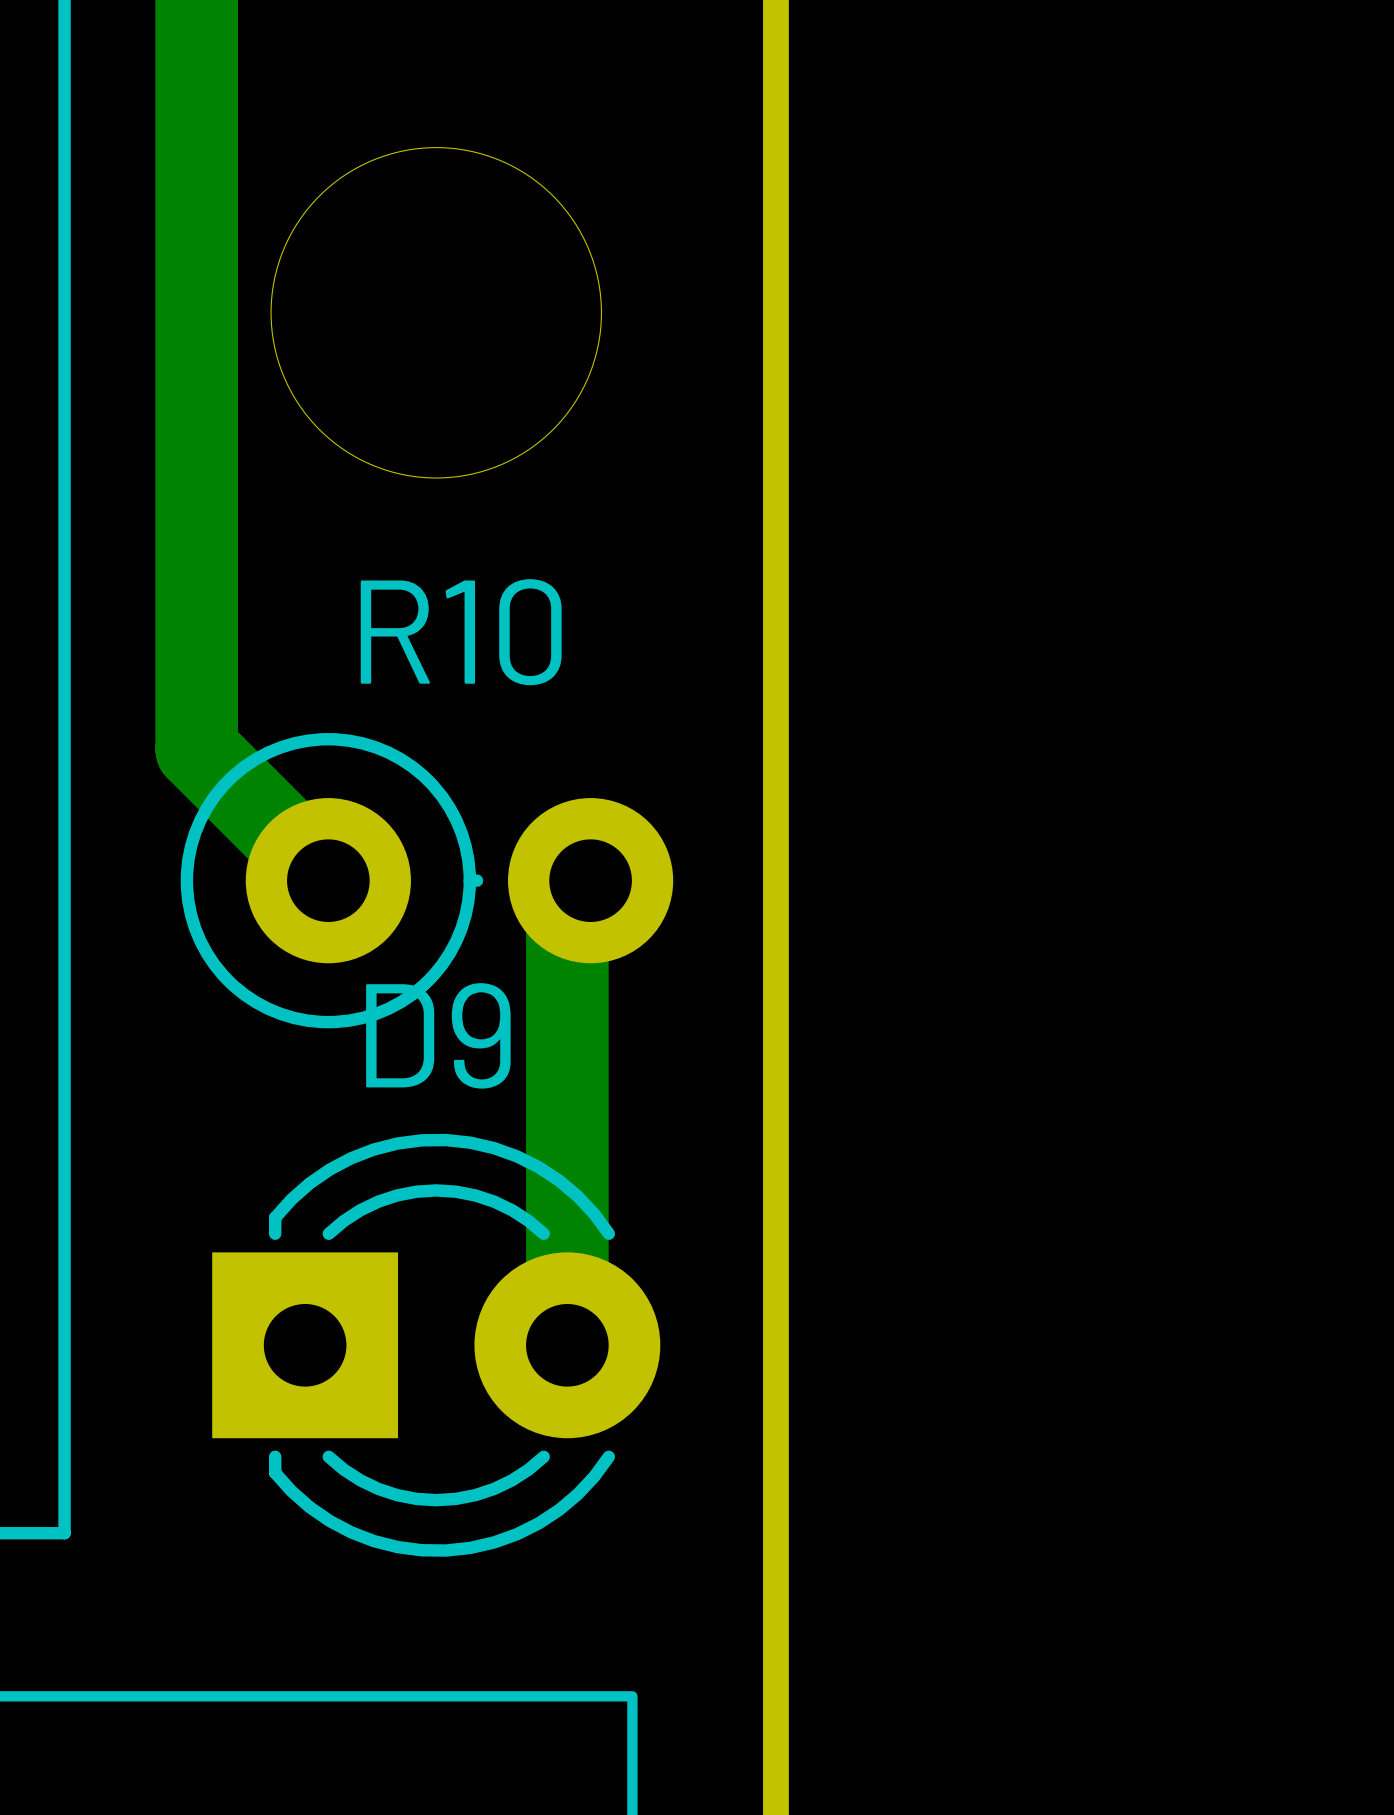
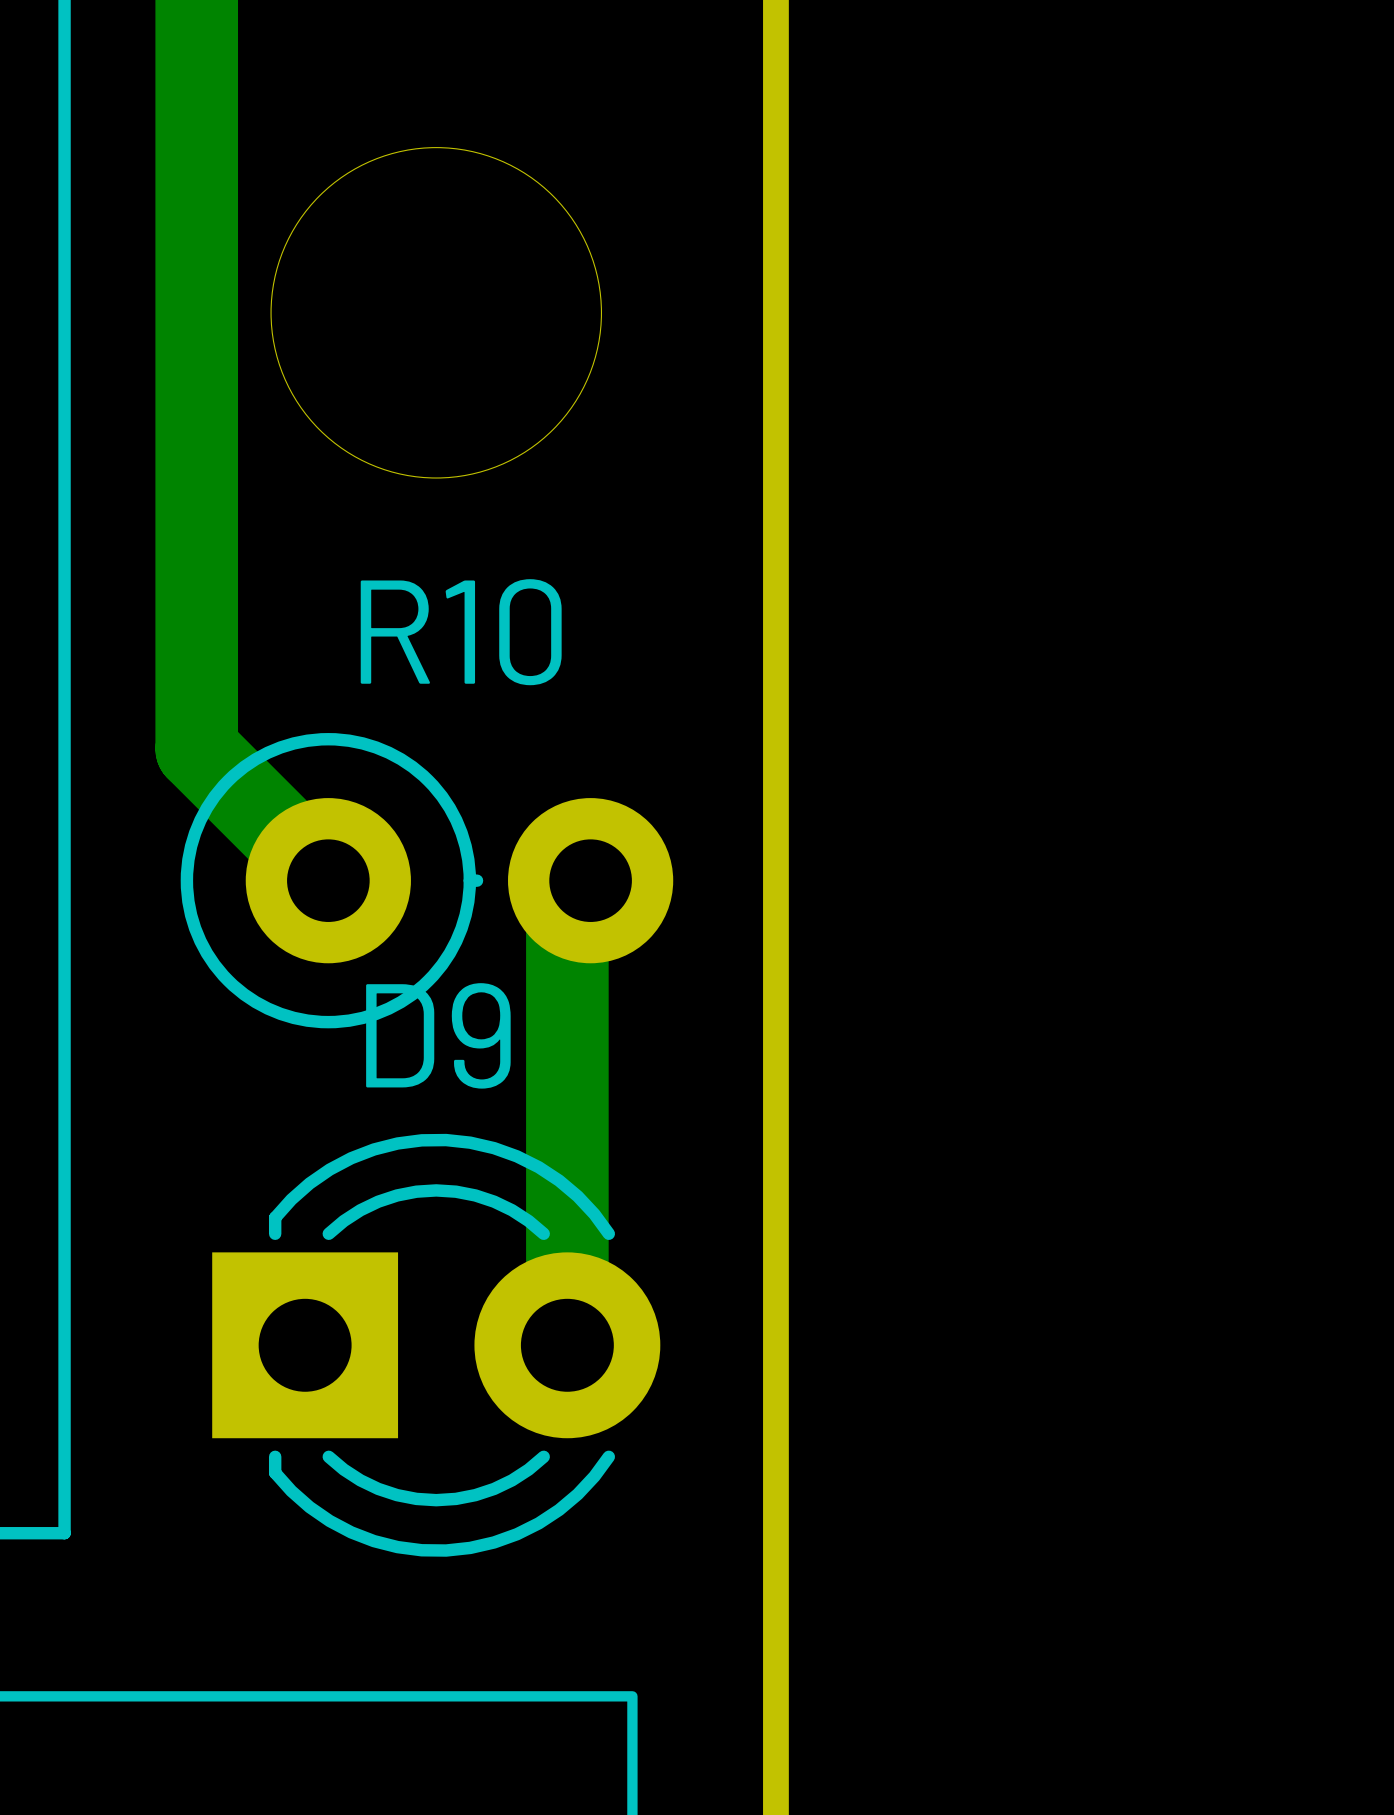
D9 footprint: [212, 1133, 661, 1557] -> [212, 1133, 661, 1557]

